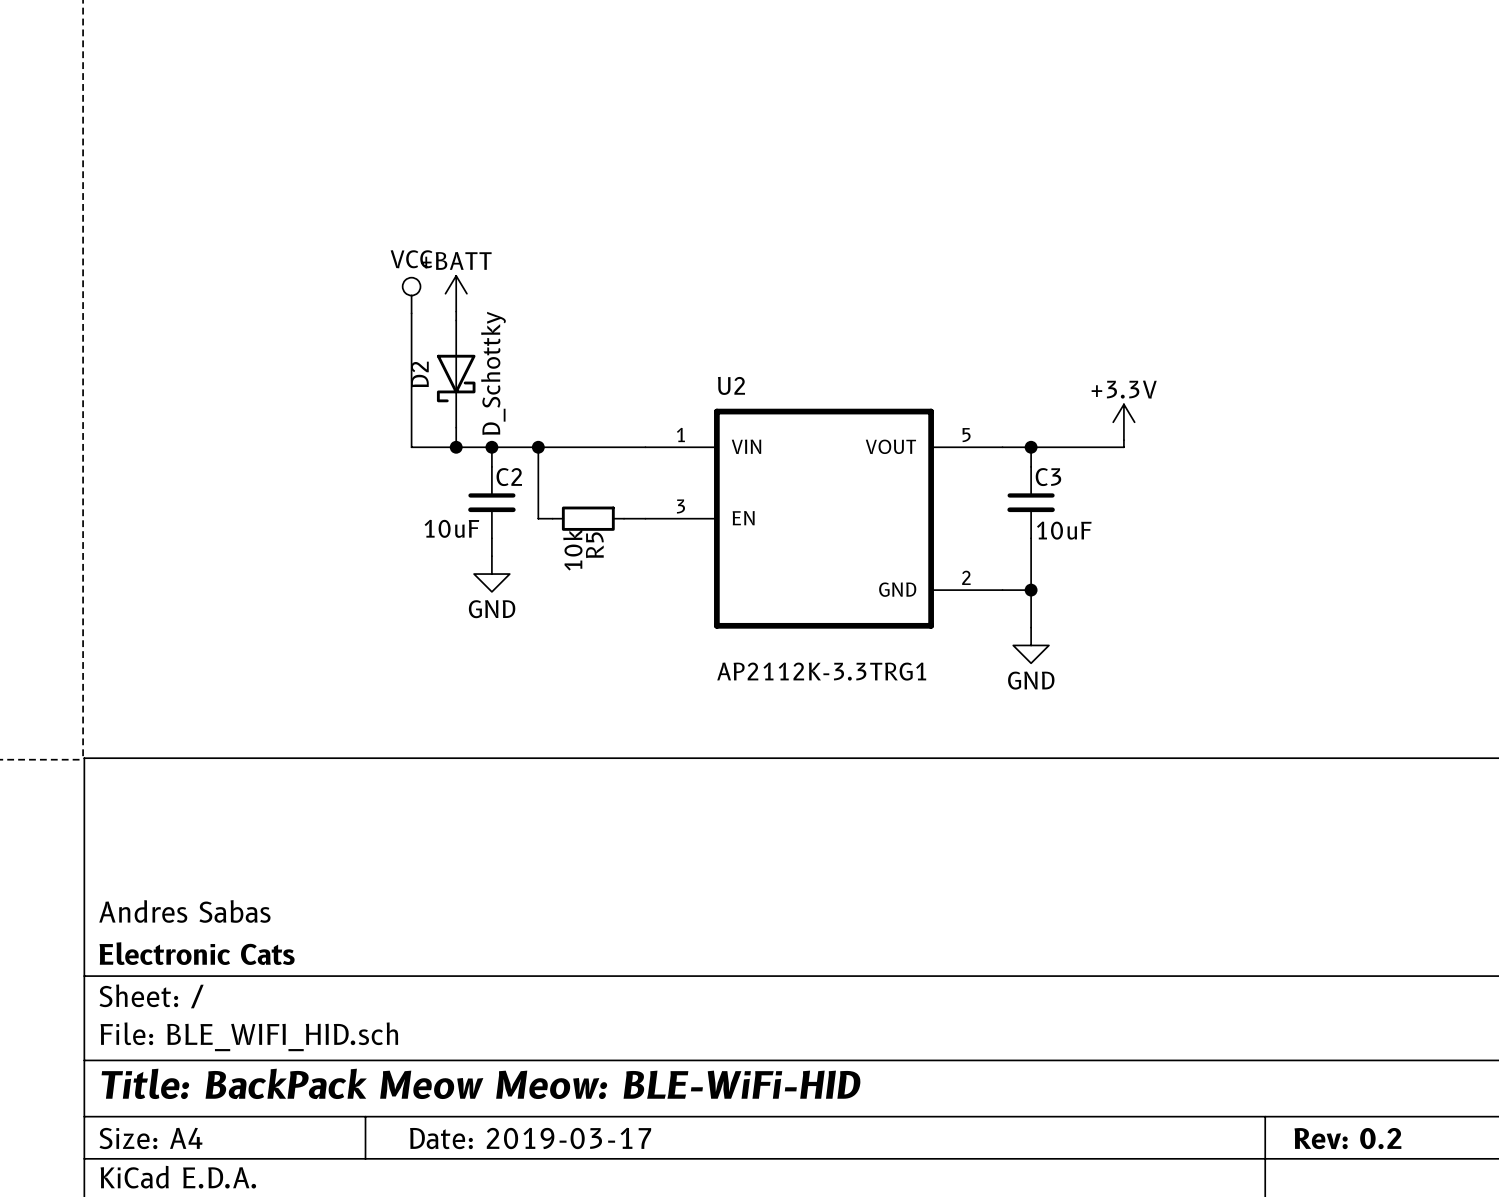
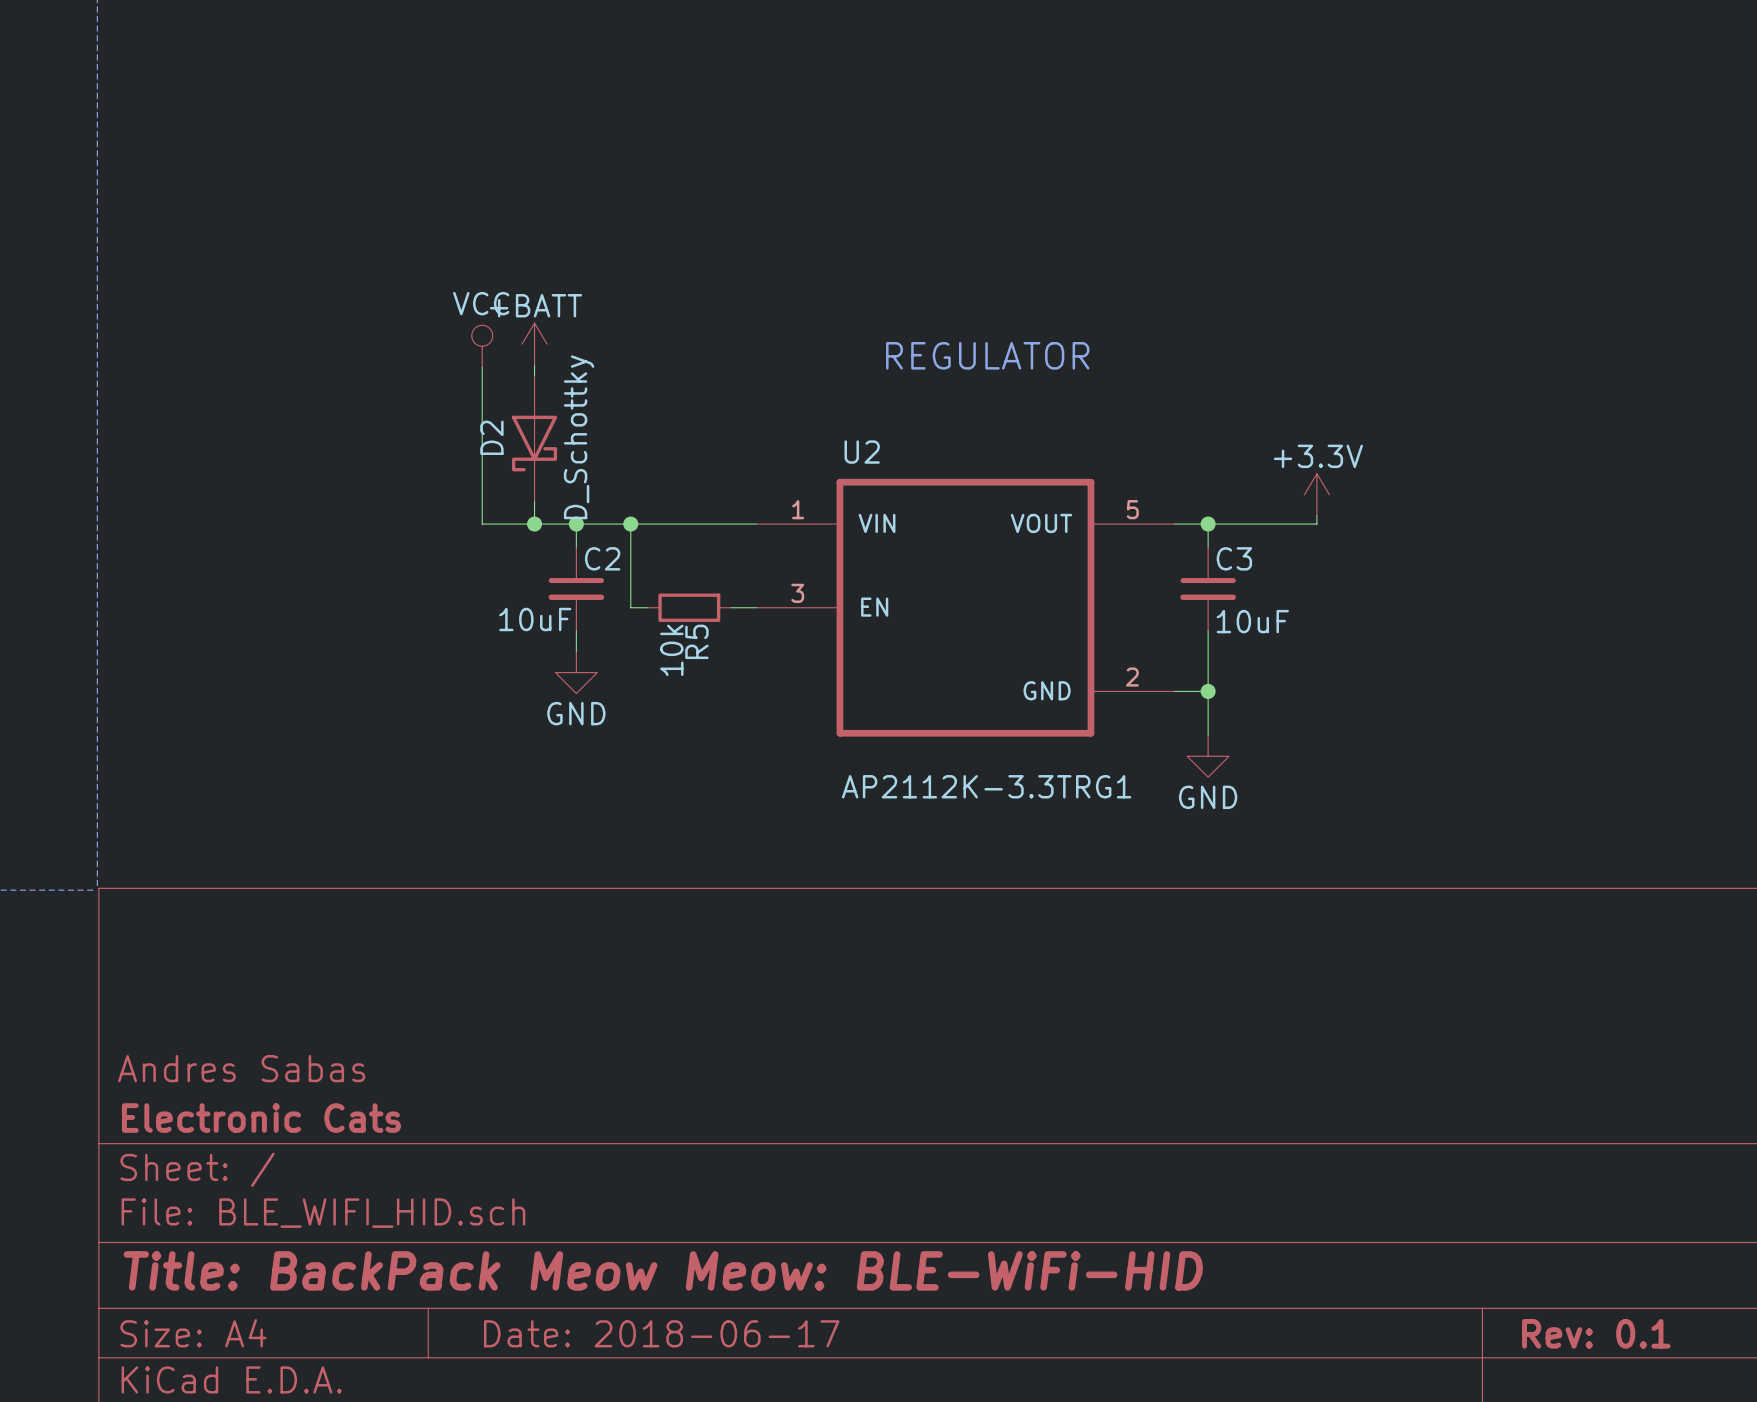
text: none -> REGULATOR (987, 355)
title block: Date: 2019-03-17 (530, 1138) -> Date: 2018-06-17 (661, 1333)
title block: Rev: 0.2 (1347, 1138) -> Rev: 0.1 (1596, 1333)

